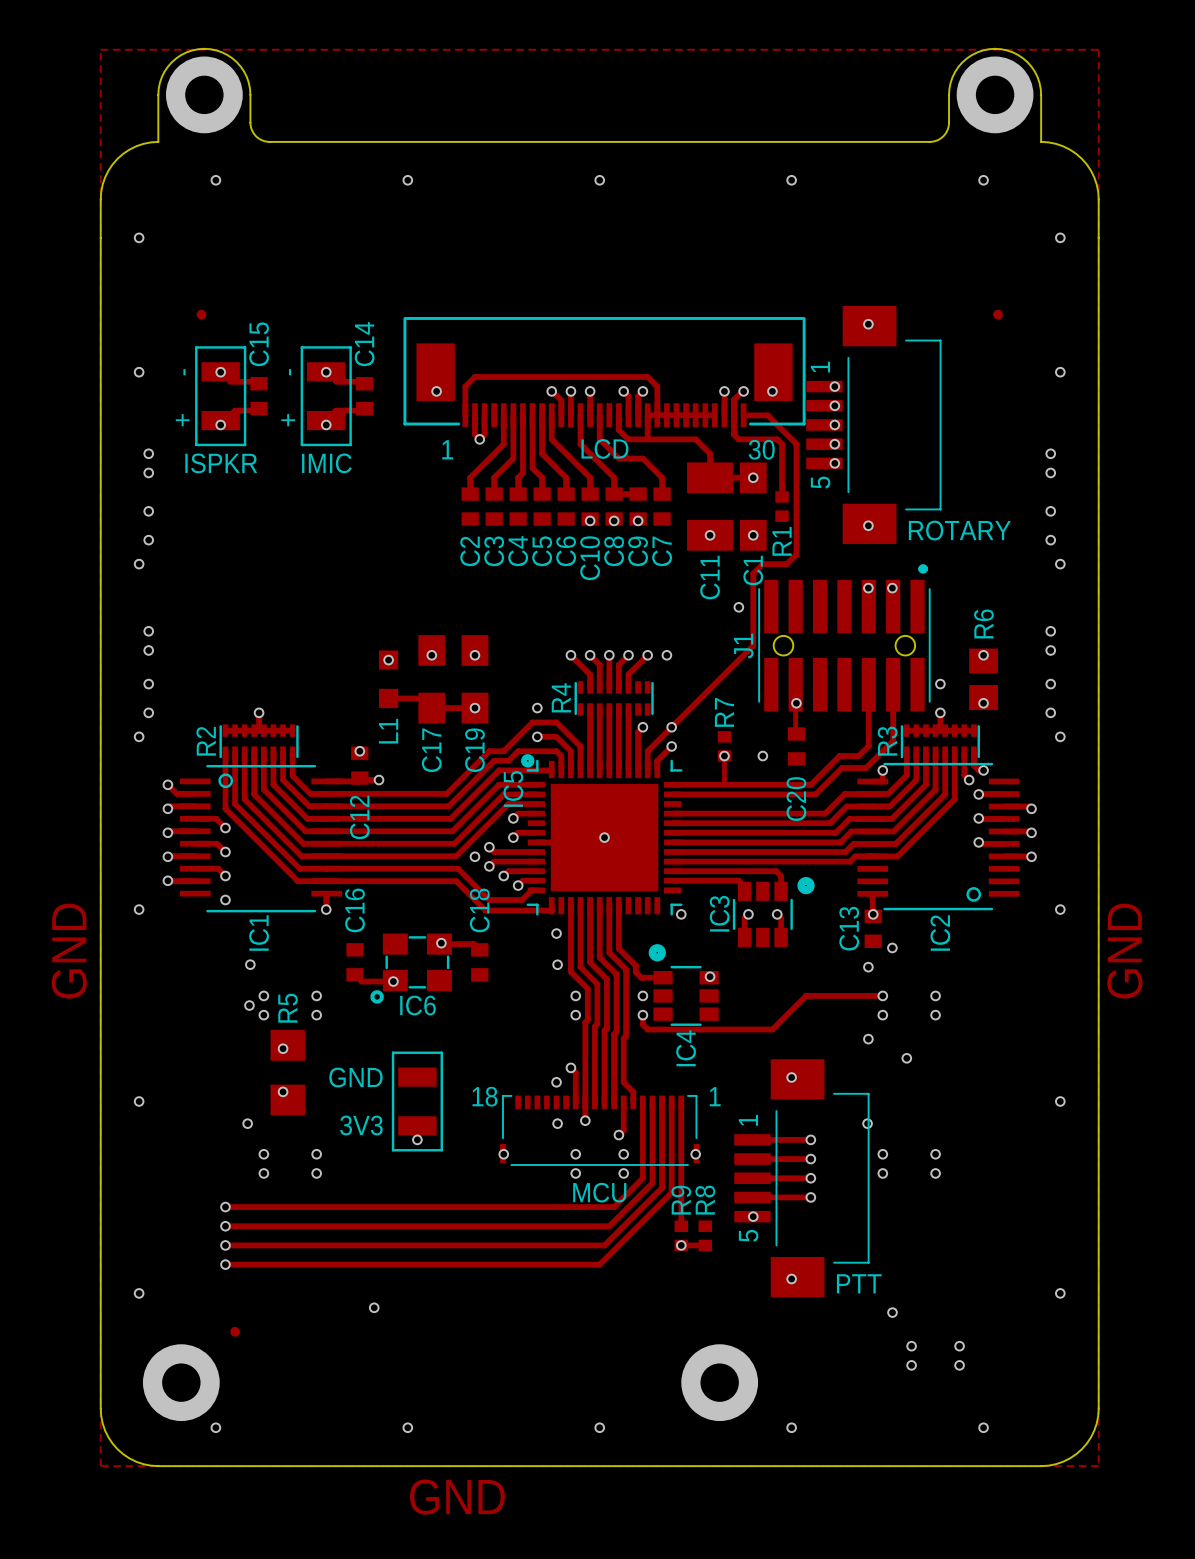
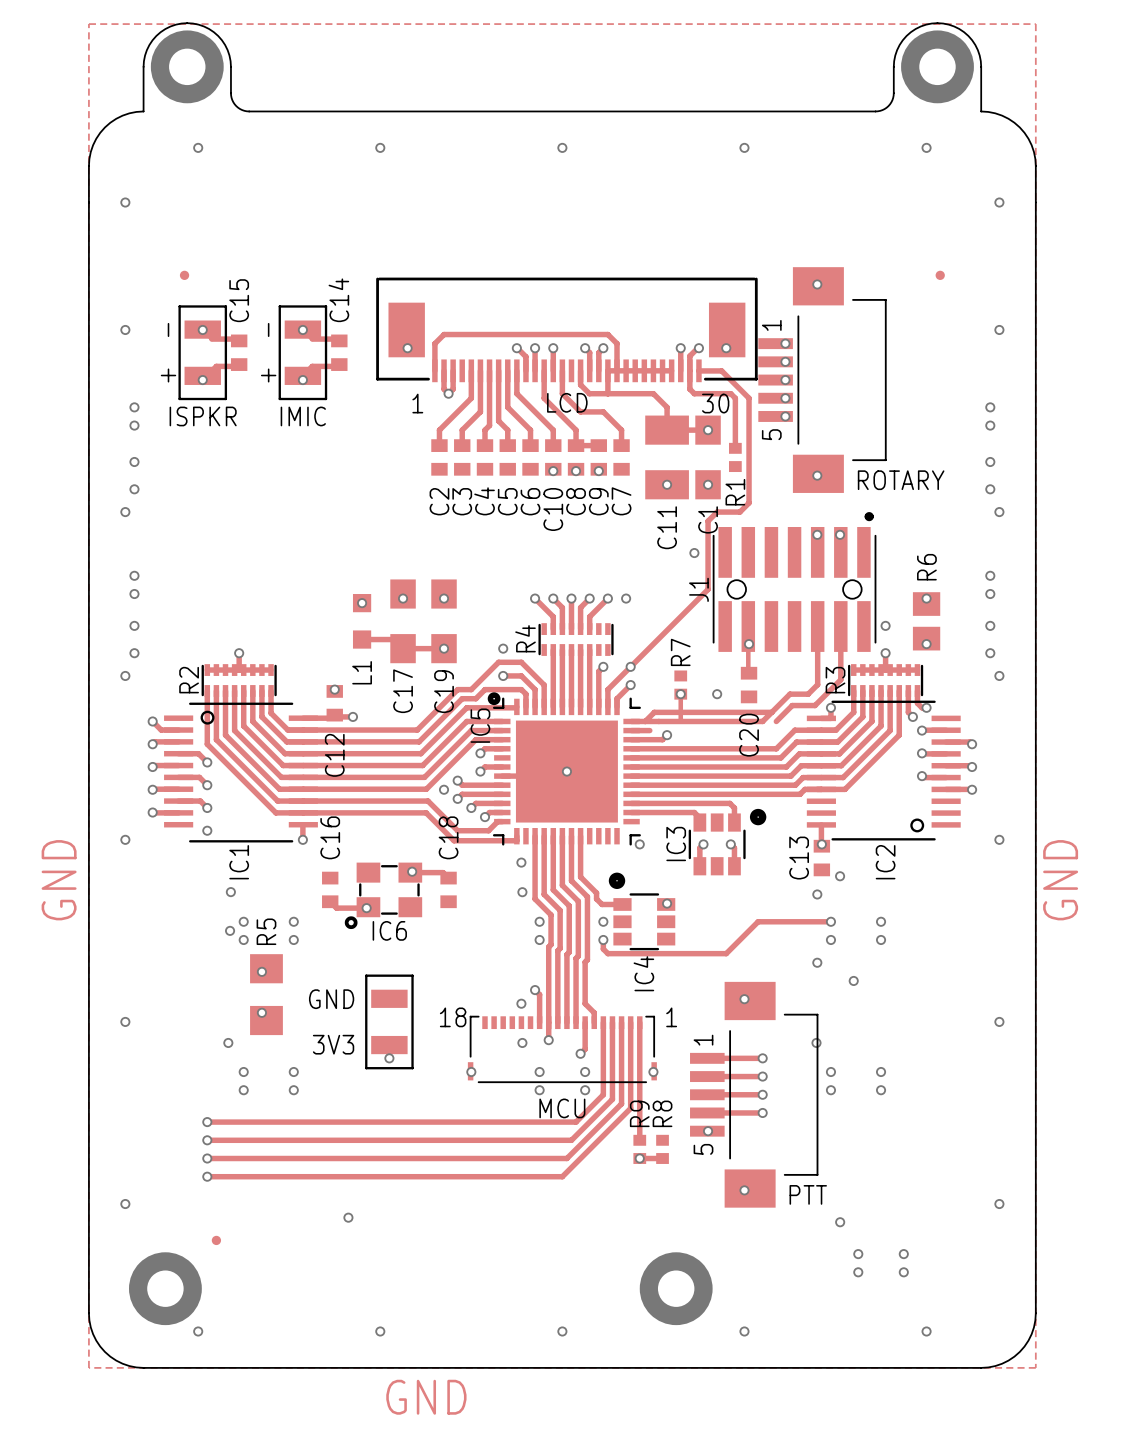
track: none -> (771, 712) (654, 712) (645, 721)
track: (825, 784) (815, 794) (691, 794) -> none
track: none -> (667, 735) (662, 739) (631, 739)
via: none -> (667, 735)

